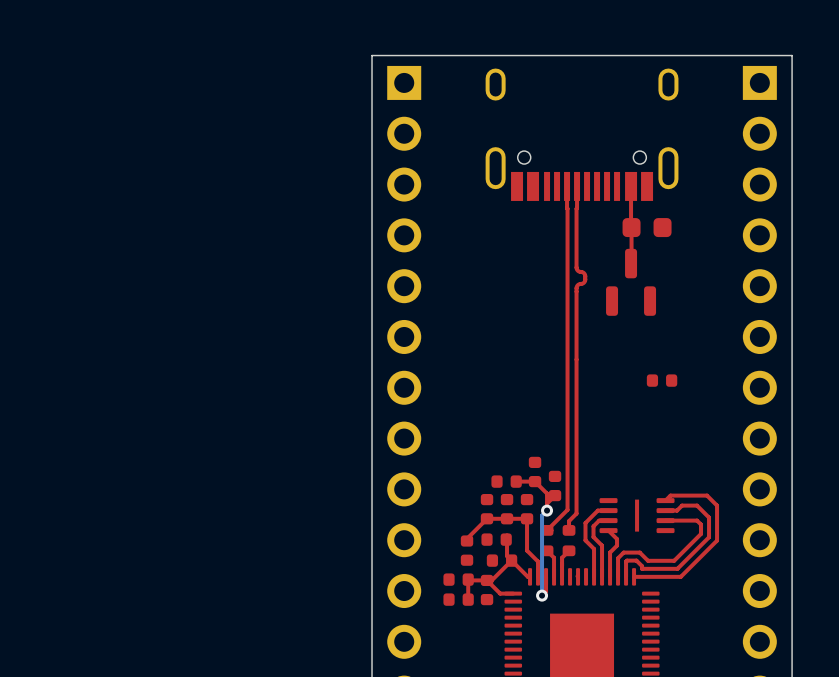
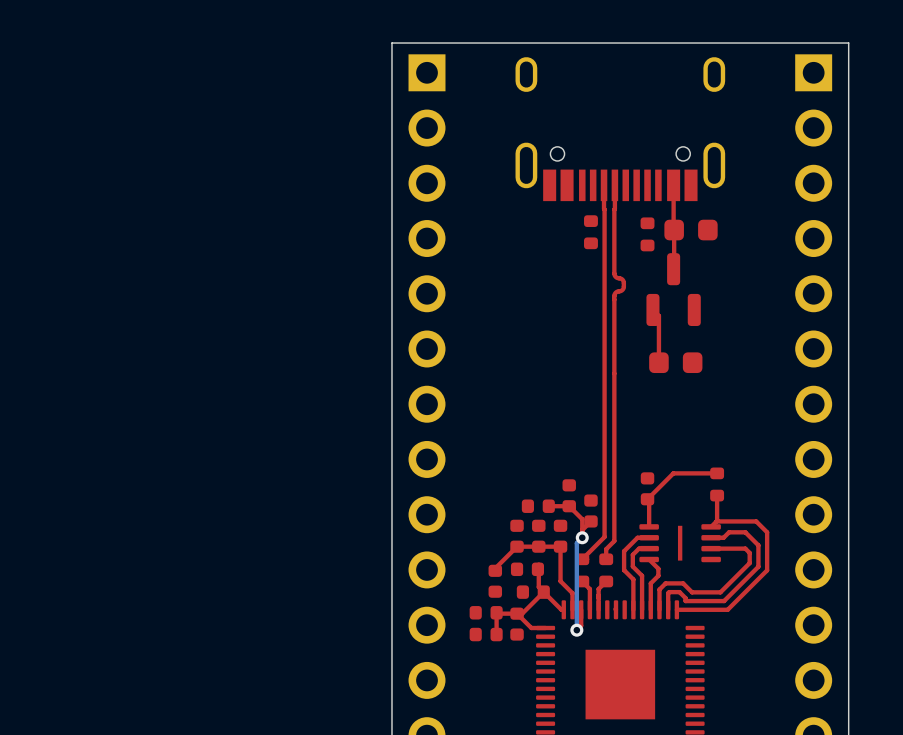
part: none -> (590, 232)
part: none -> (647, 234)
top track: none -> (652, 309) (658, 315) (658, 362)
part: none -> (675, 362)
part rotation: 0° (662, 380) -> 90° clockwise (647, 488)
part position: (662, 380) -> (647, 488)
top track: none -> (717, 473) (673, 473) (647, 499) (649, 500) (649, 526)
part: none -> (717, 484)
top track: none -> (717, 495) (716, 521)

